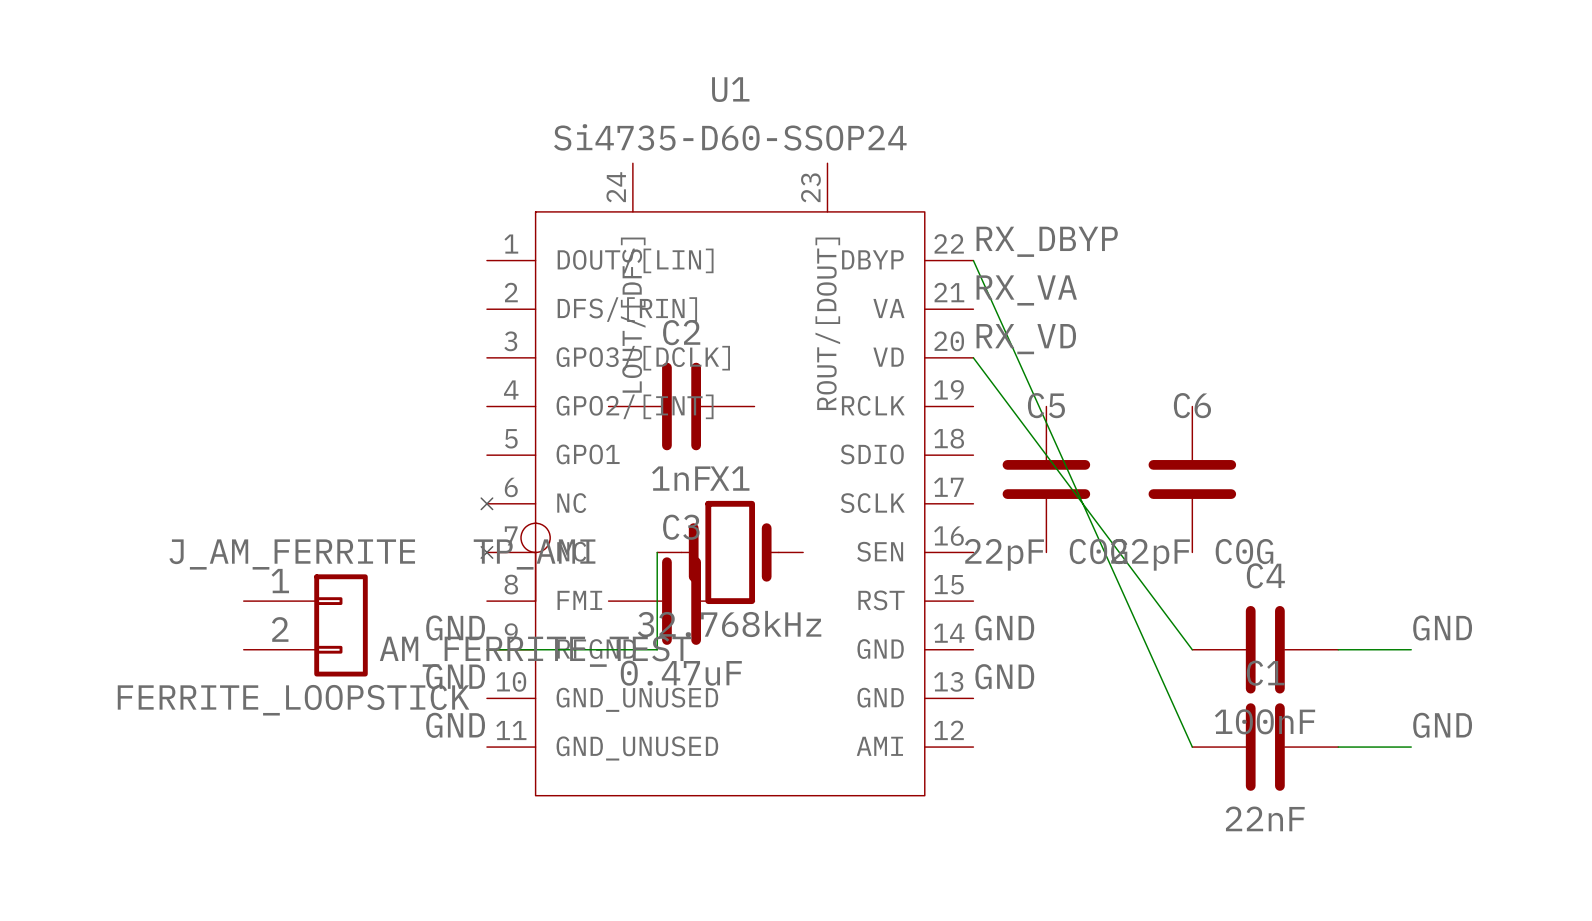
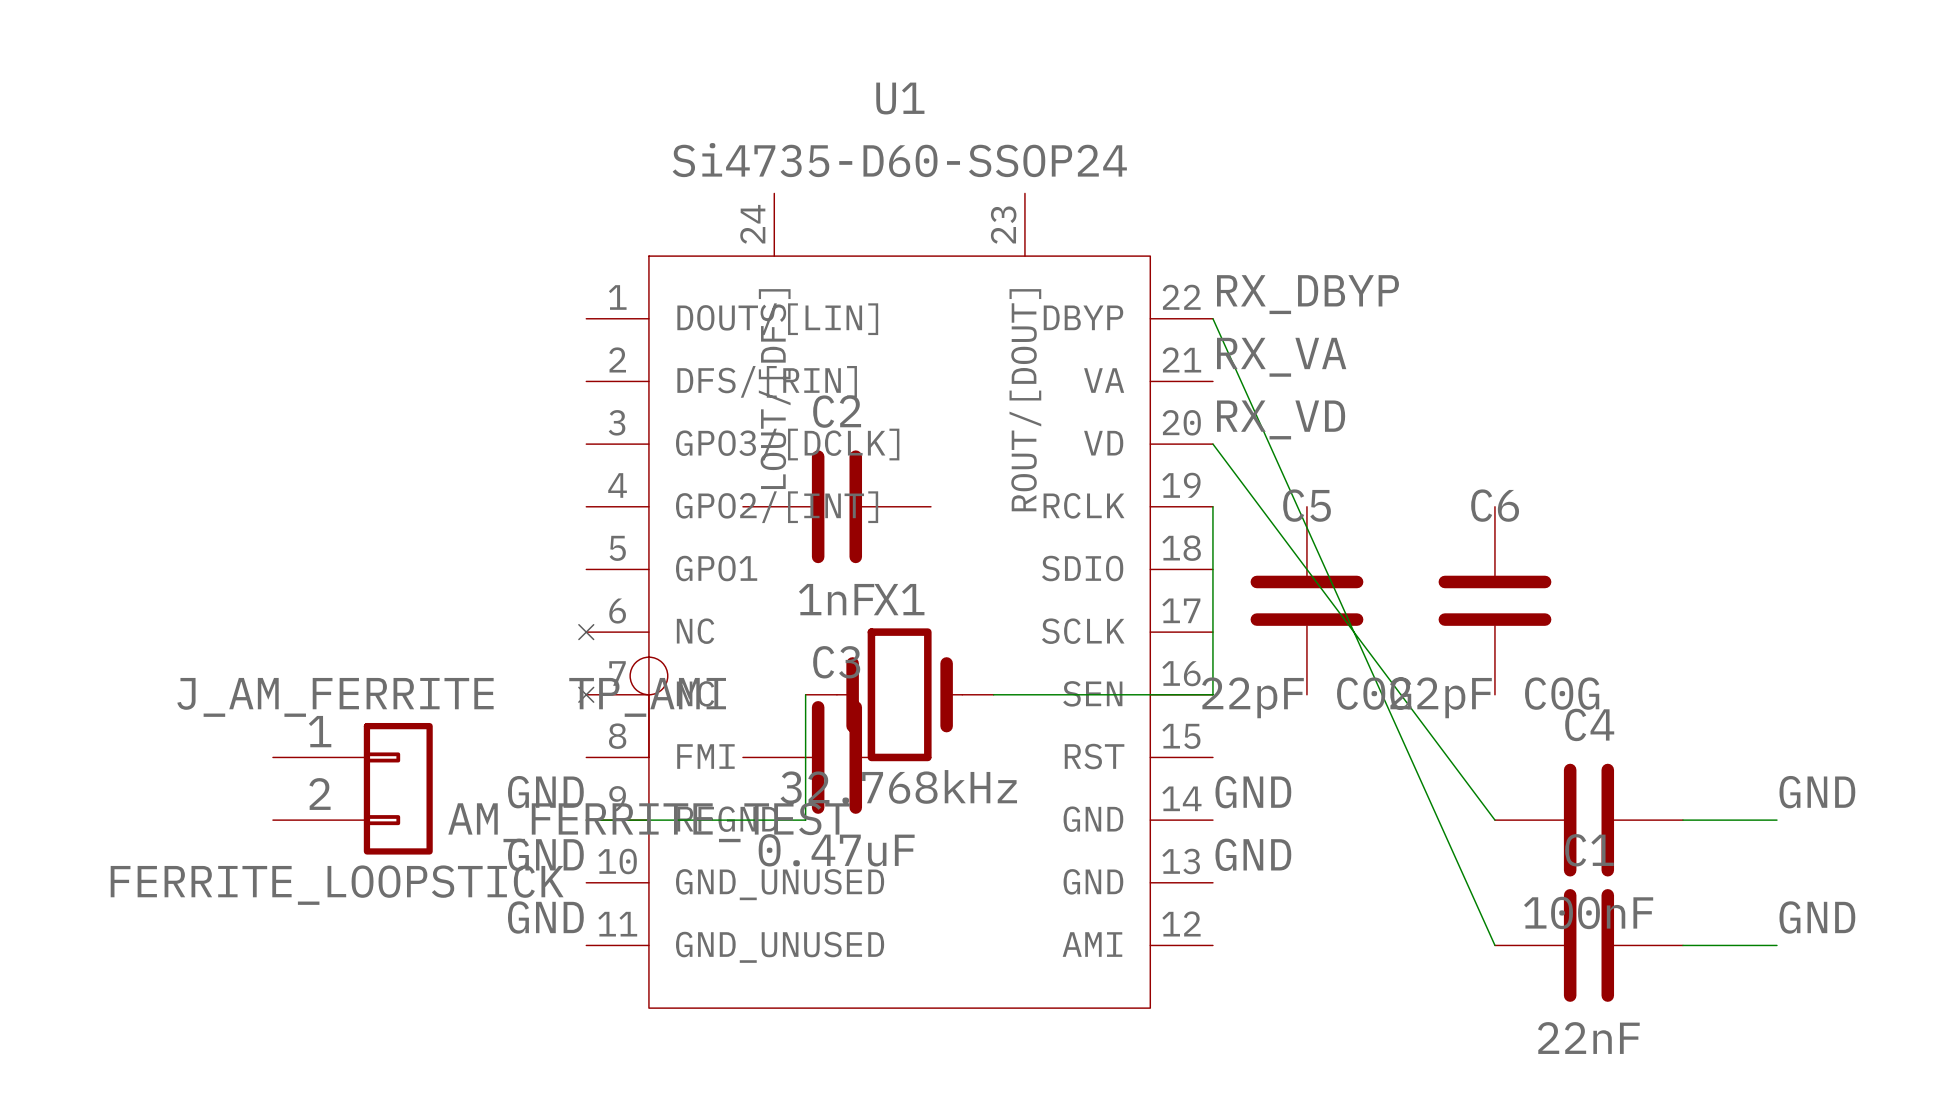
wire: none -> (1212, 506) (1212, 694) (993, 694)

